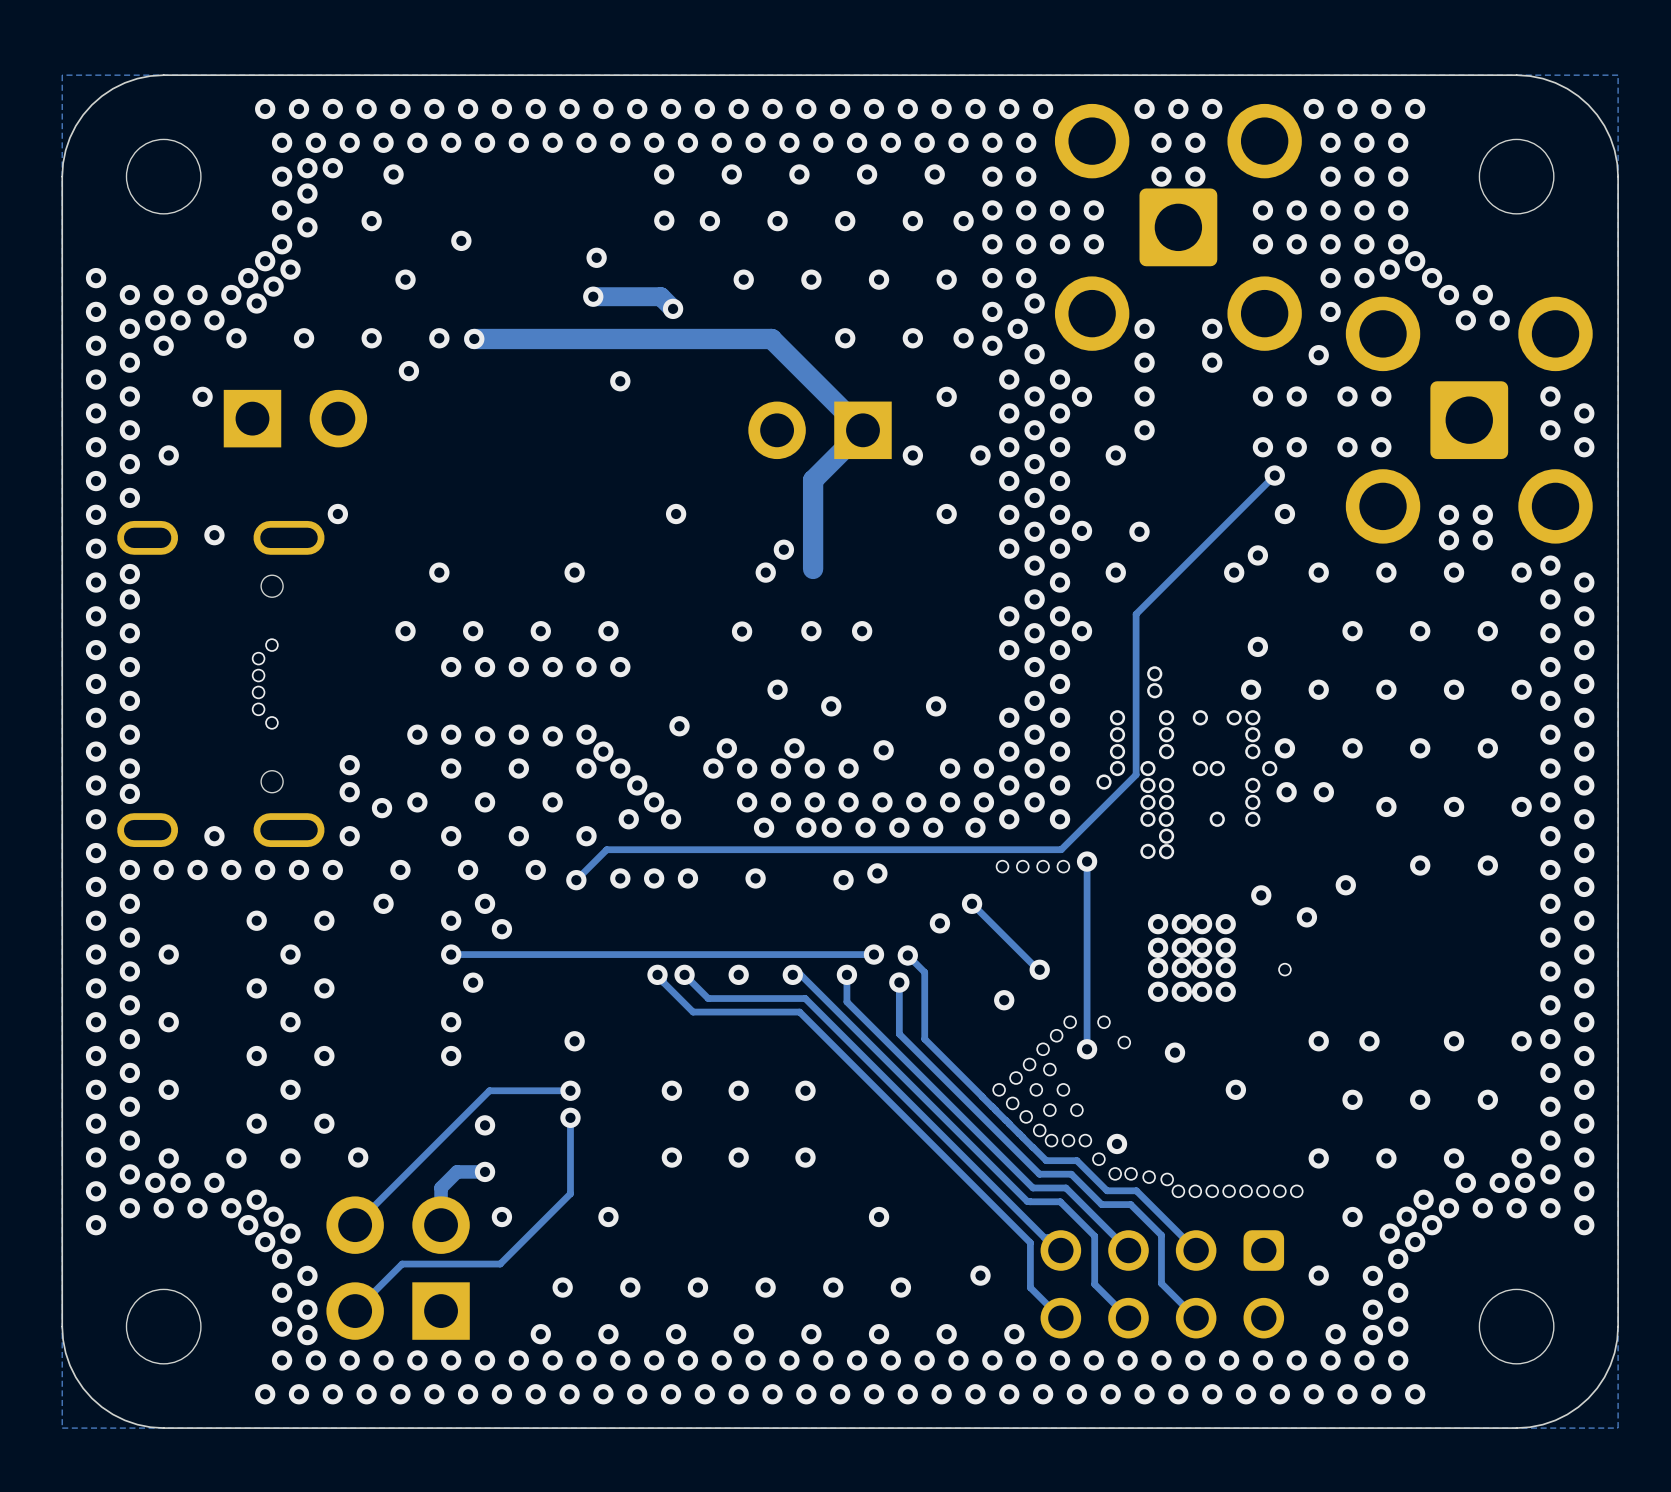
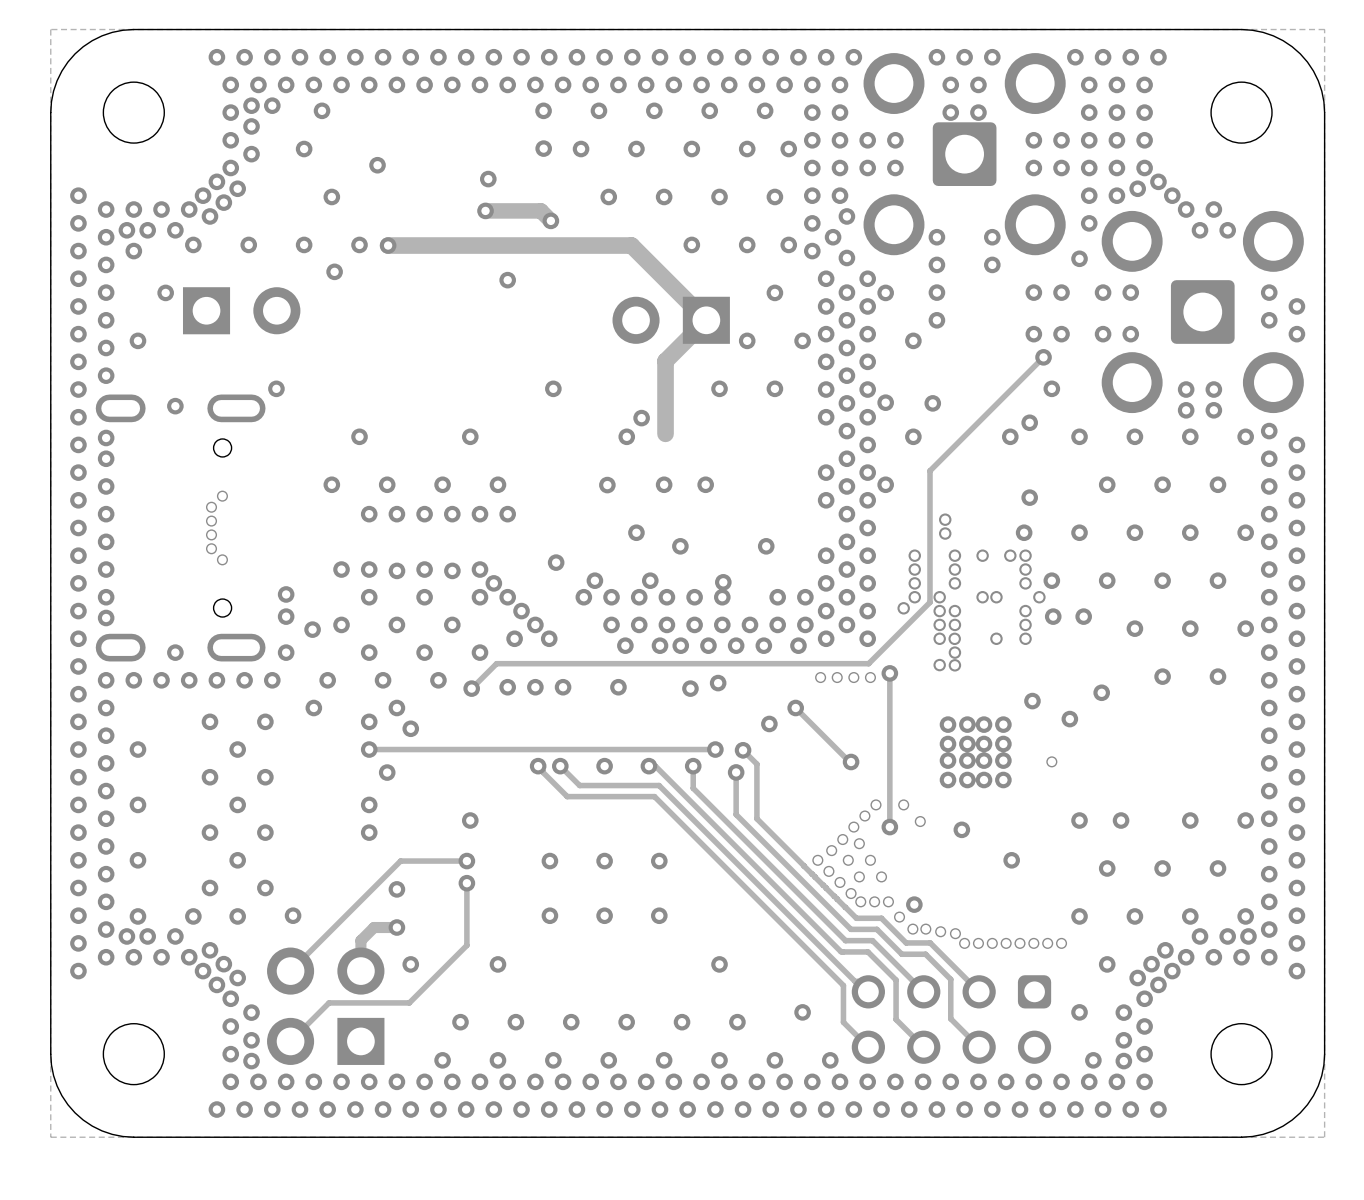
via: none -> (719, 388)
via: none -> (722, 597)
via: (1004, 1000) -> none

